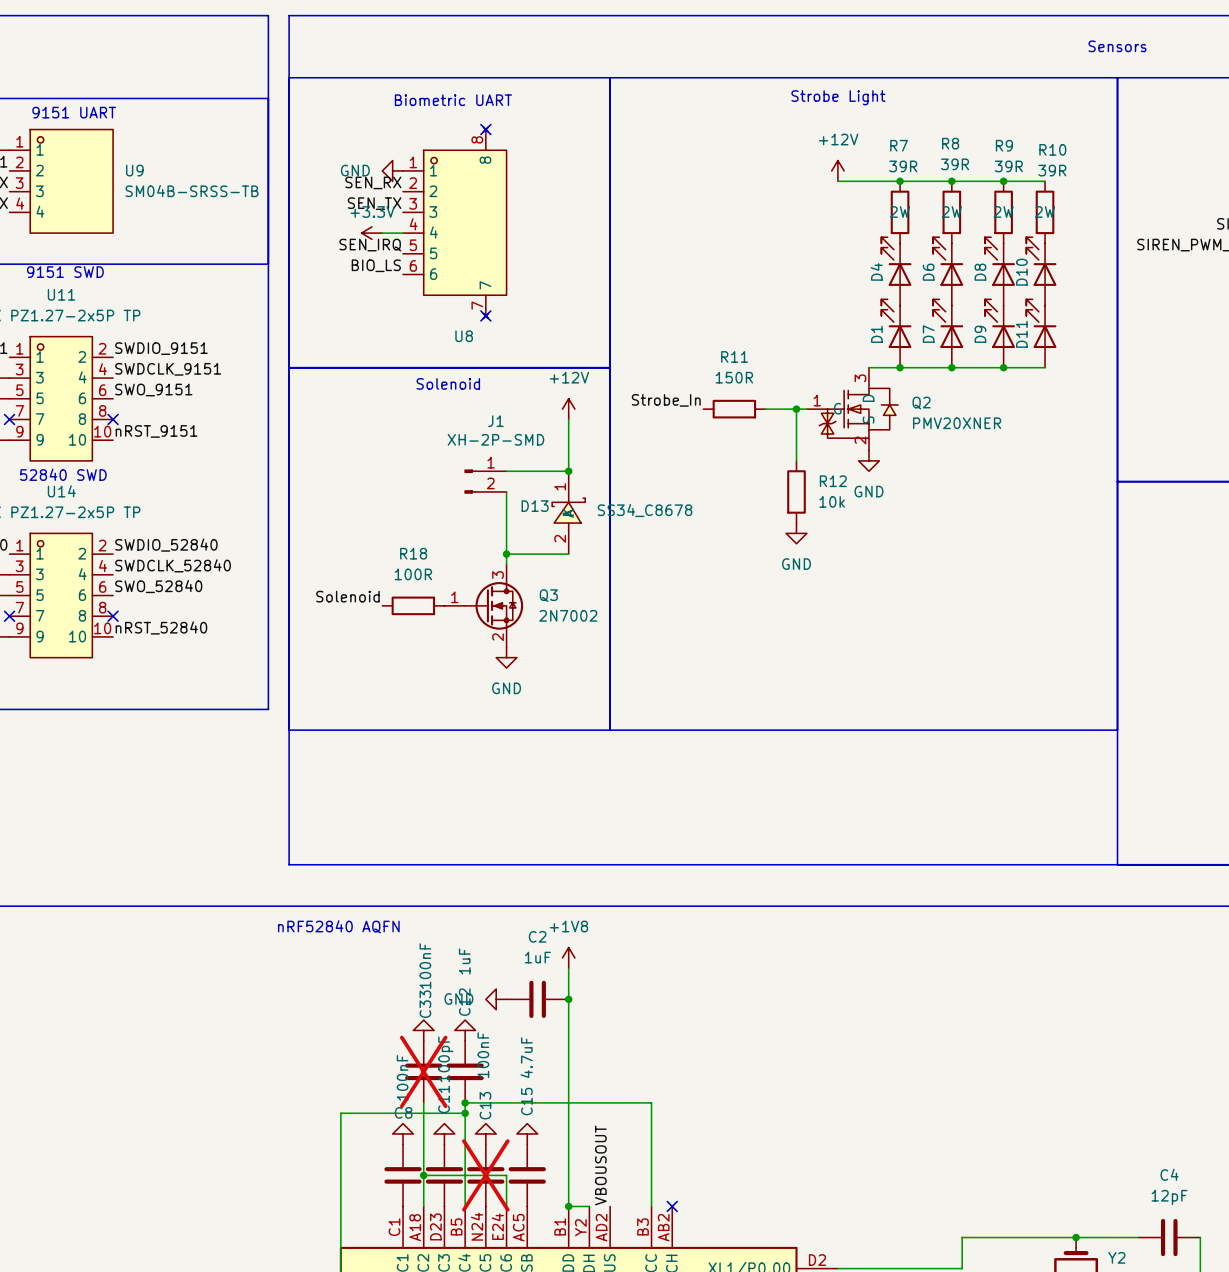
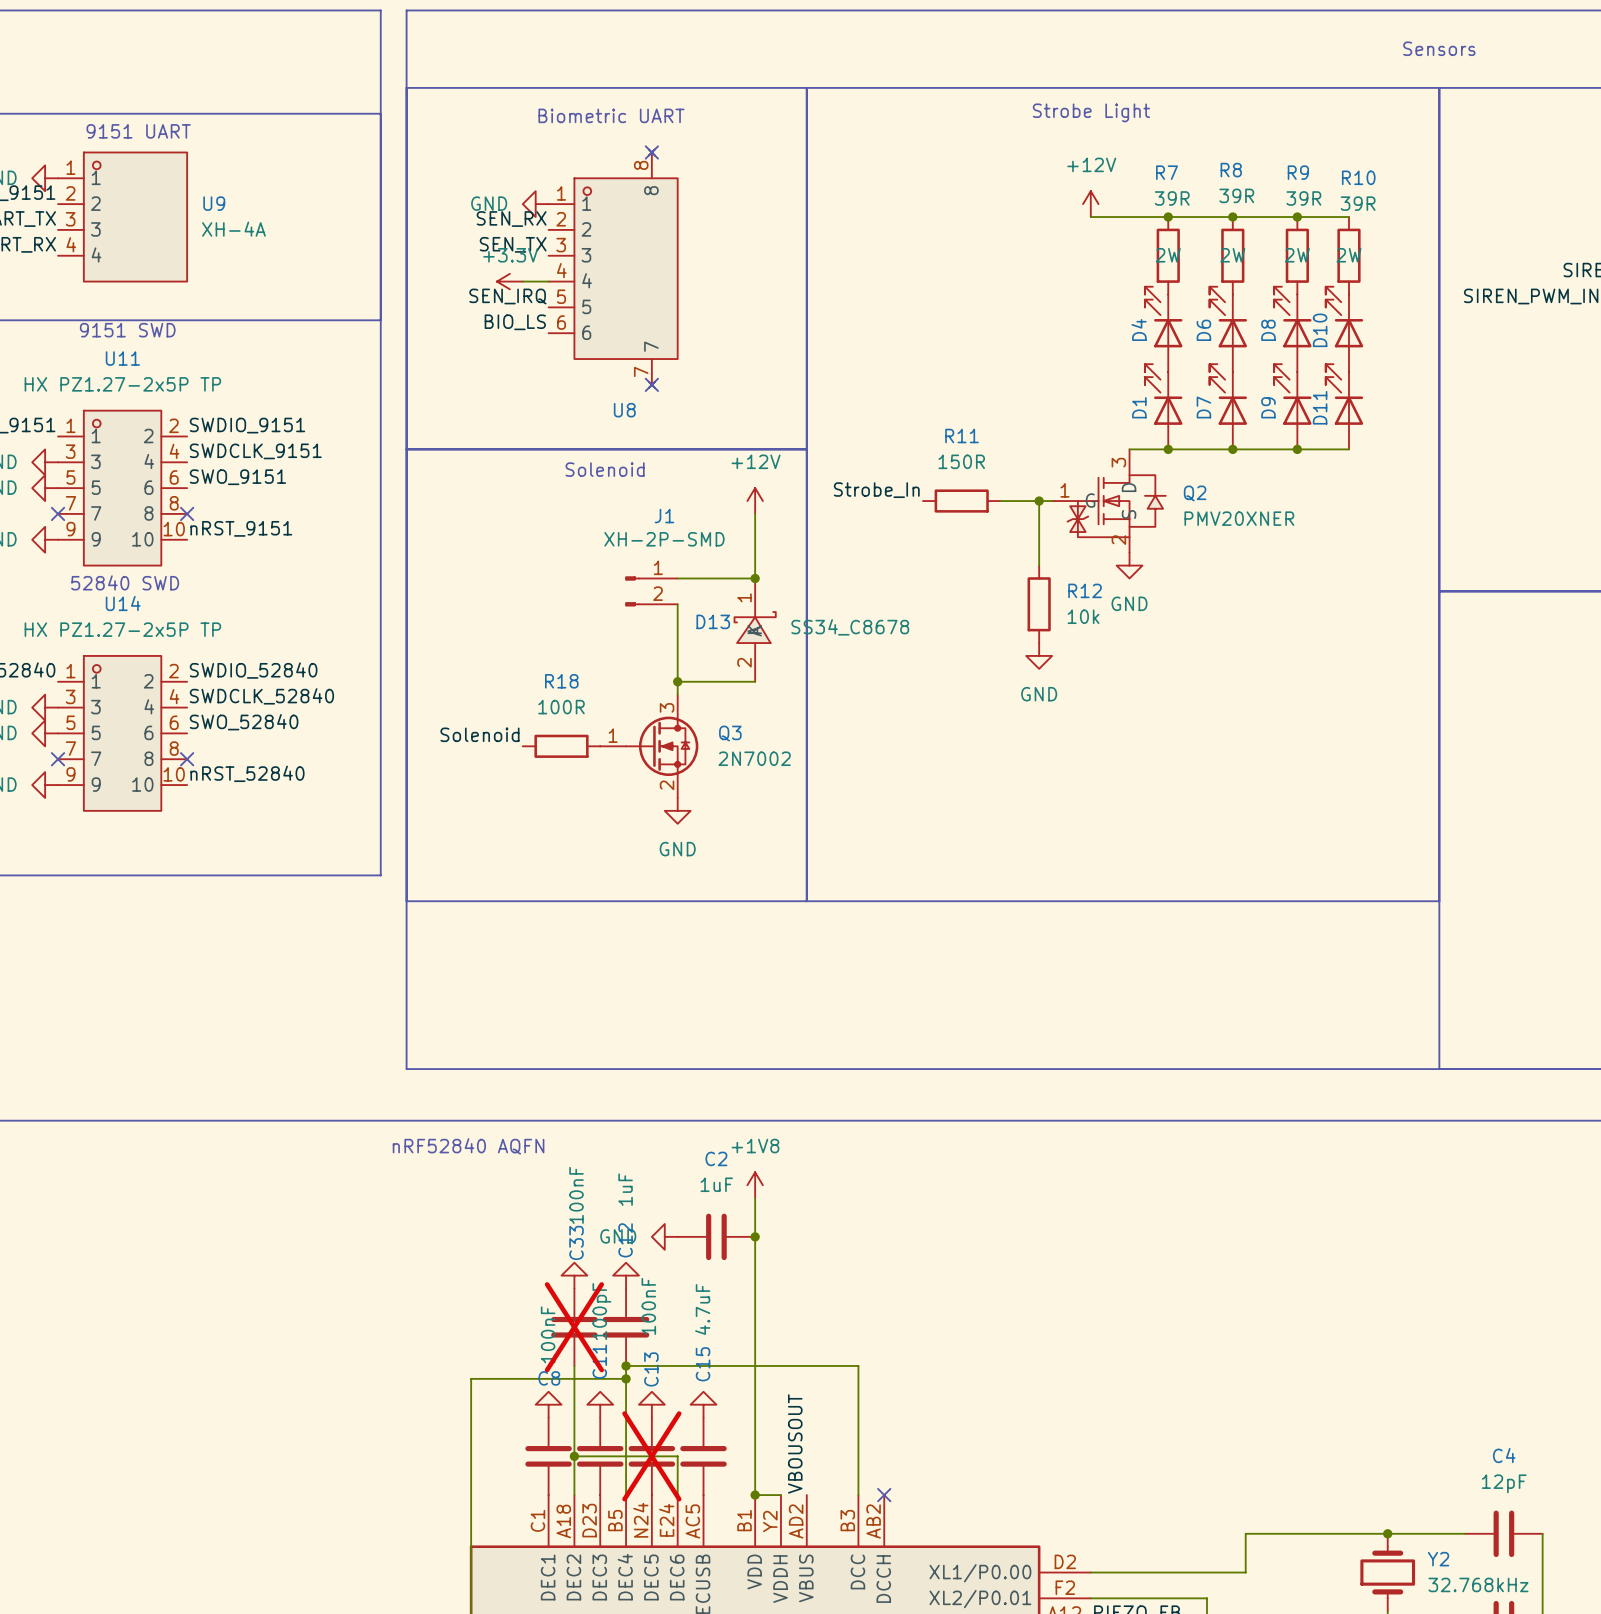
U9 value: SM04B-SRSS-TB (192, 191) -> XH-4A (233, 229)

